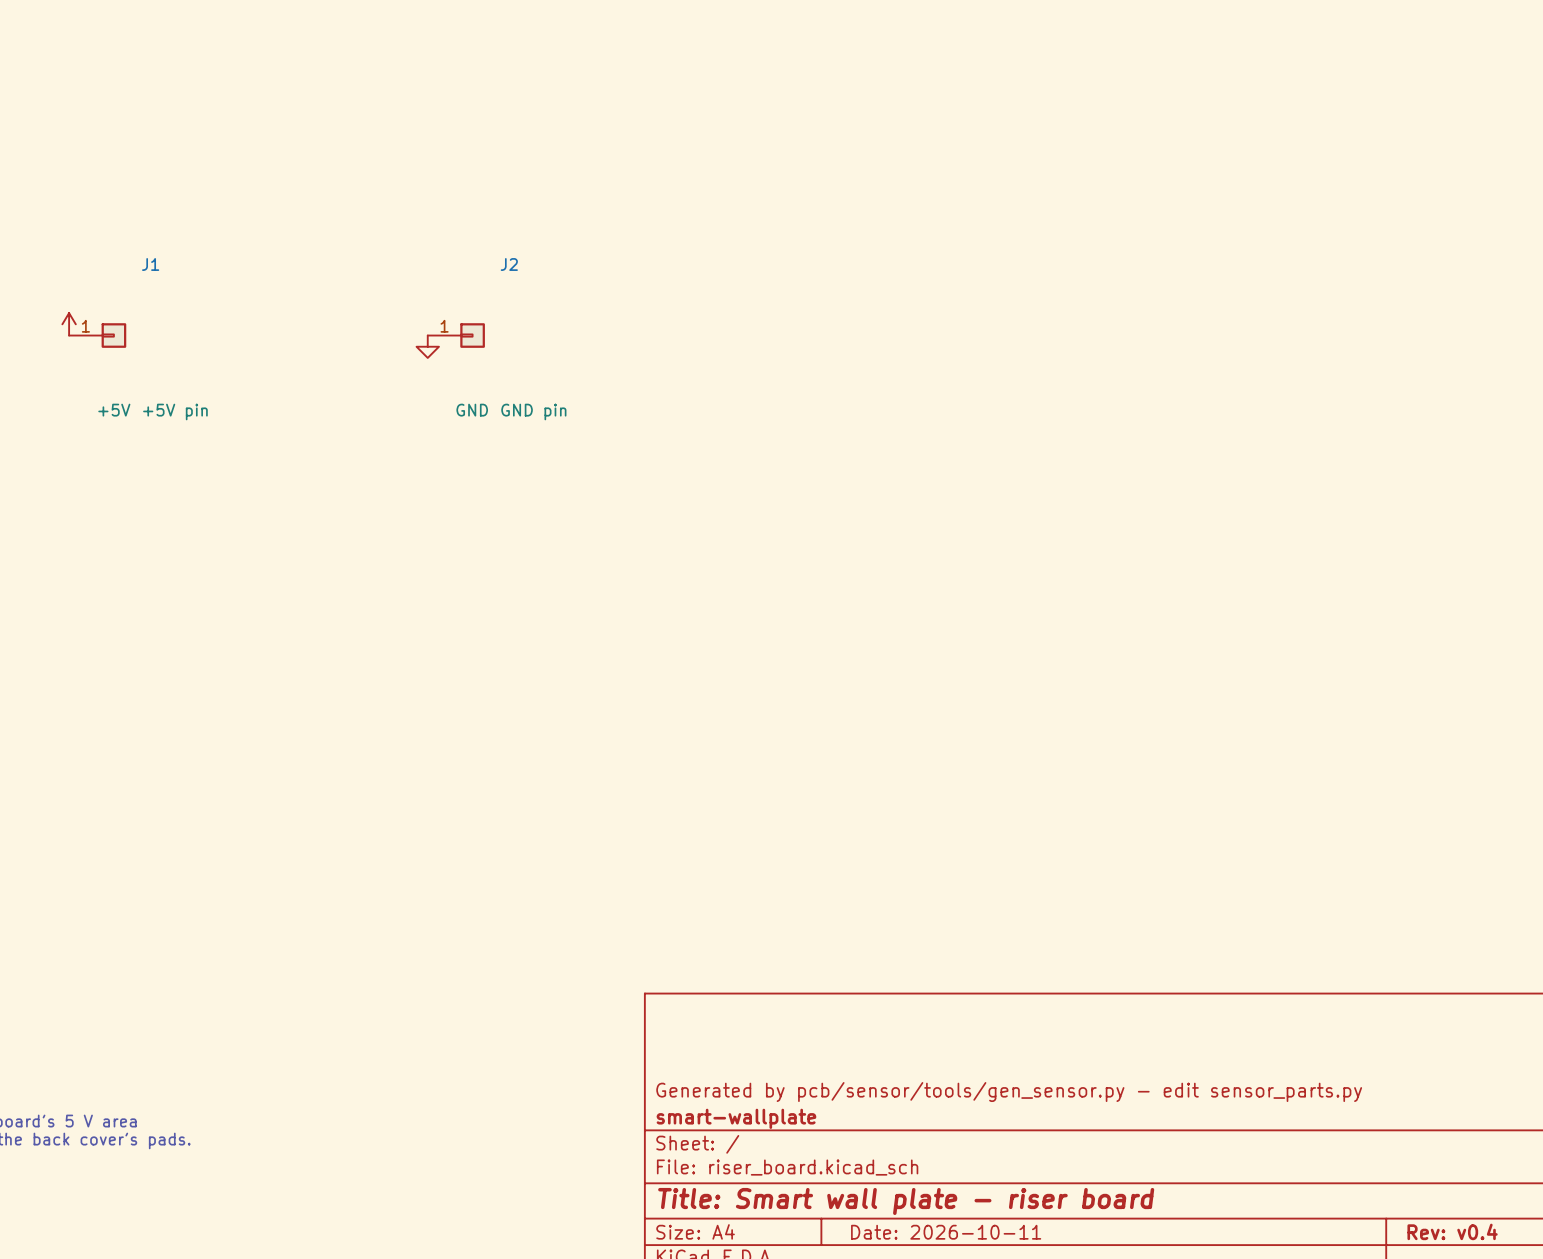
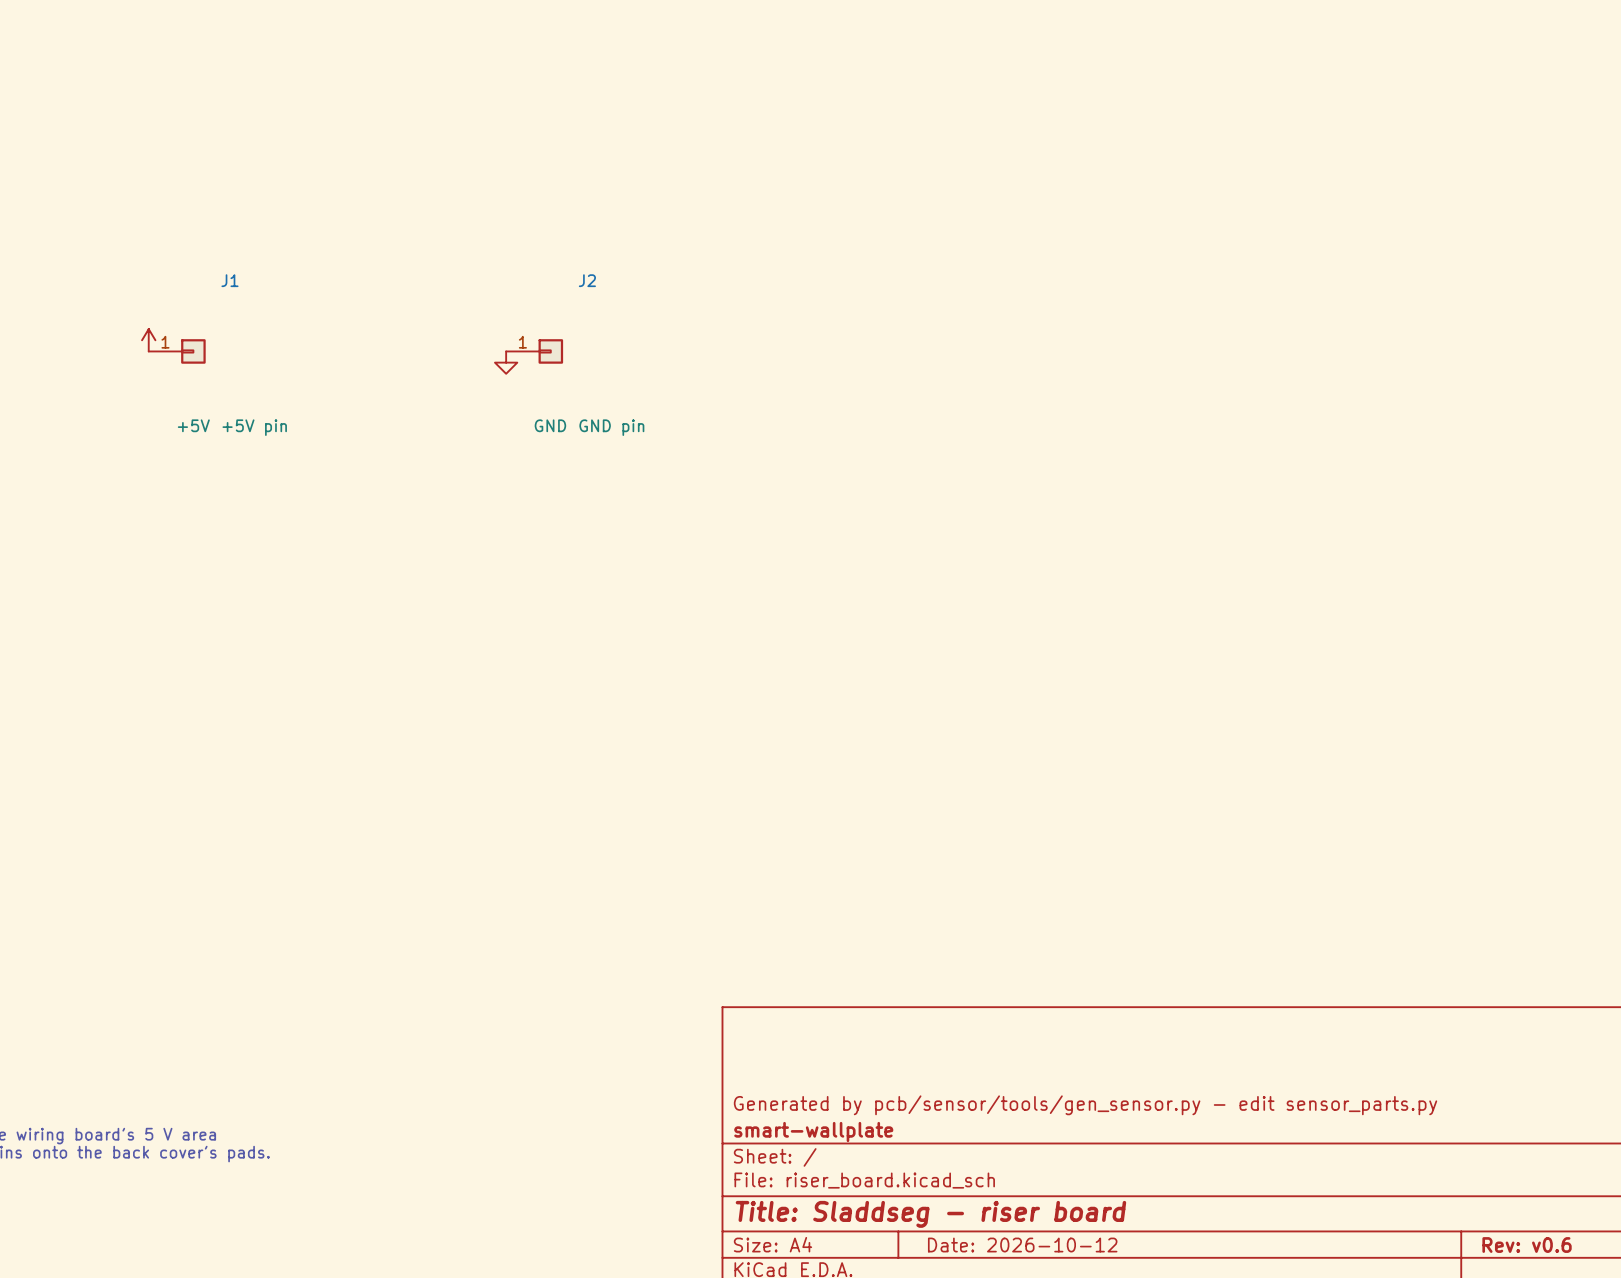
title block: Title: Smart wall plate - riser board (906, 1201) -> Title: Sladdseg - riser board (930, 1214)
title block: Rev: v0.4 (1452, 1231) -> Rev: v0.6 (1527, 1245)
title block: Date: 2026-10-11 (946, 1232) -> Date: 2026-10-12 (1022, 1245)

